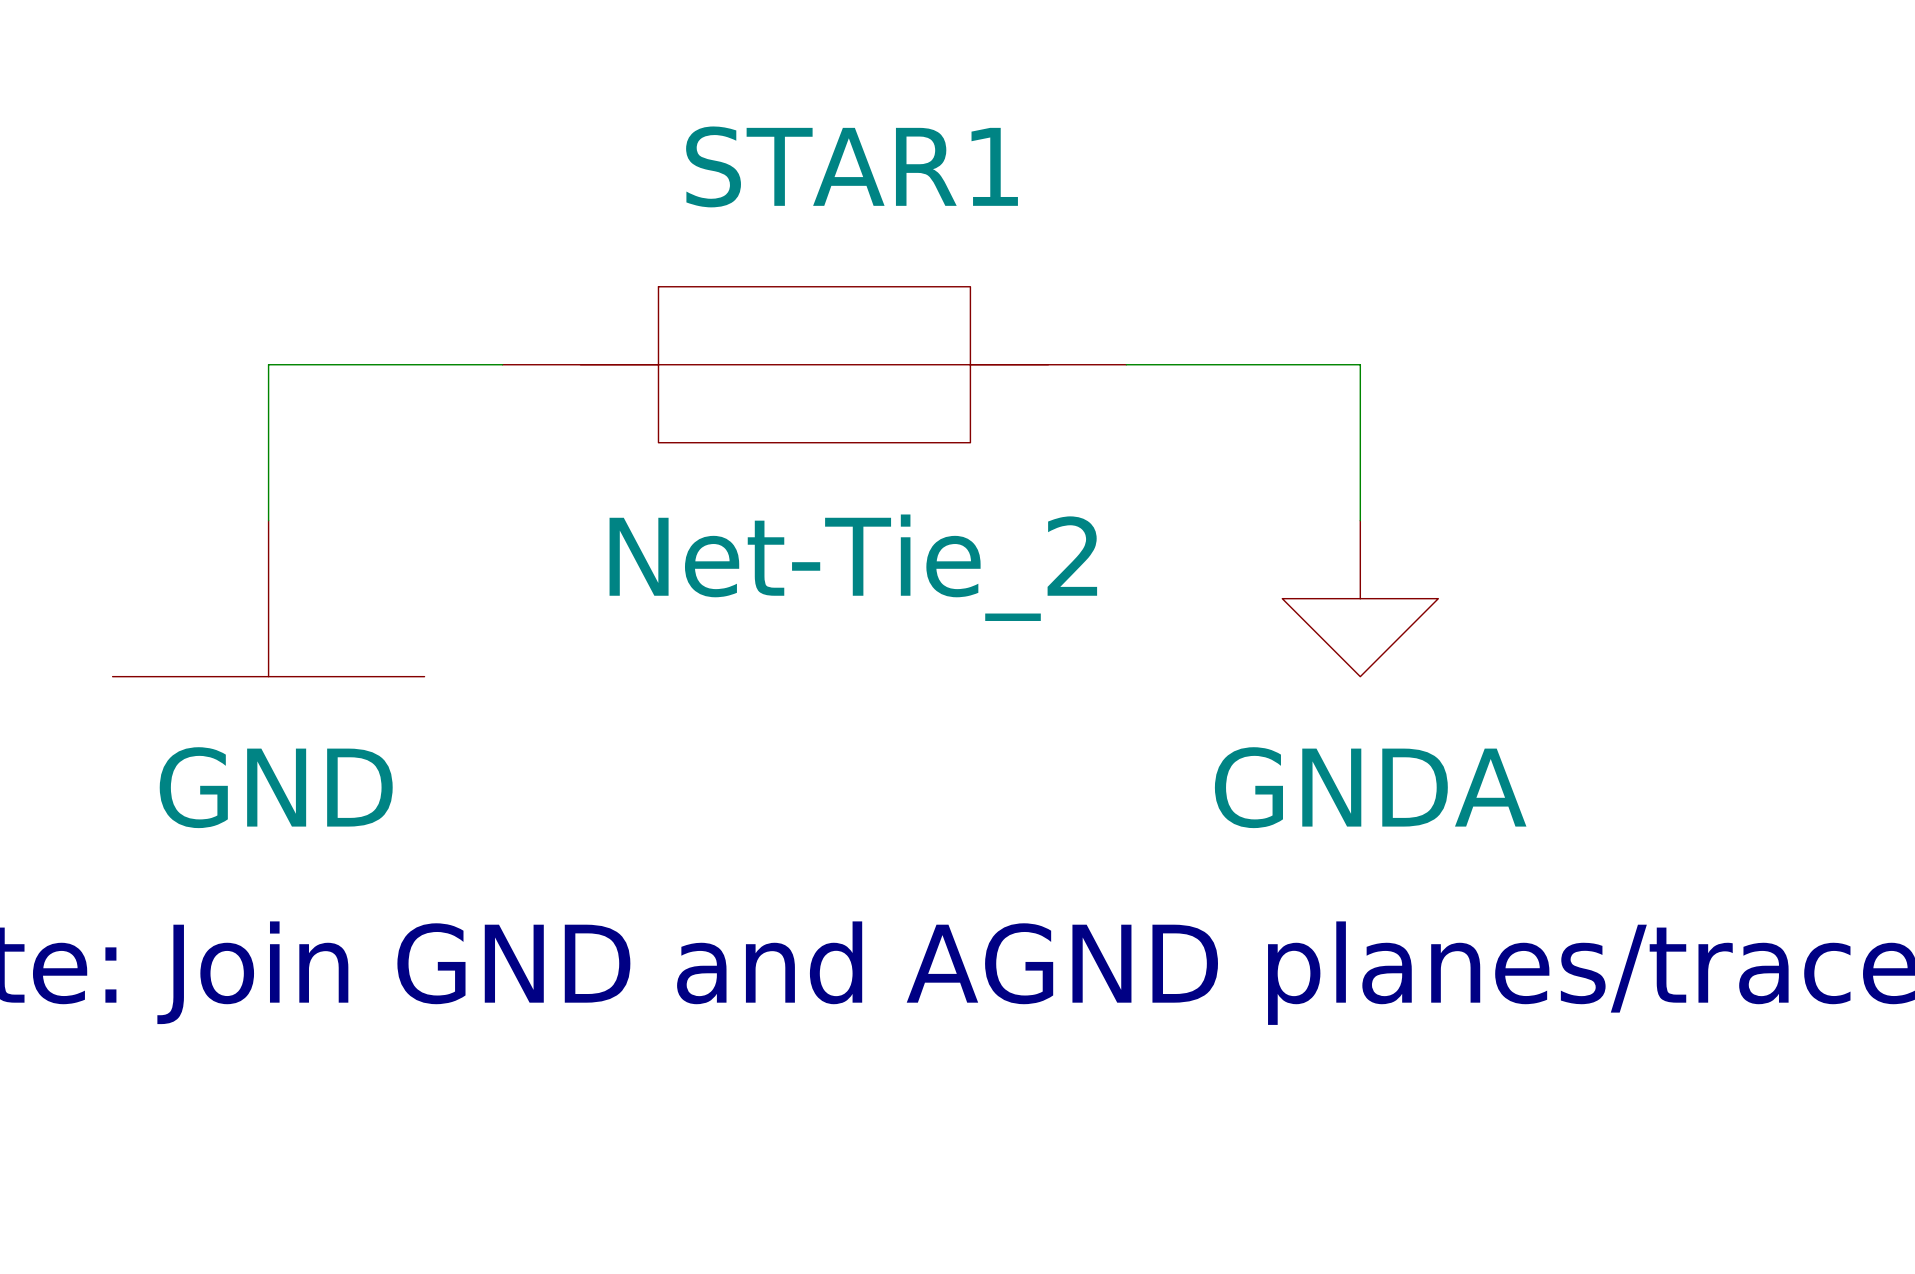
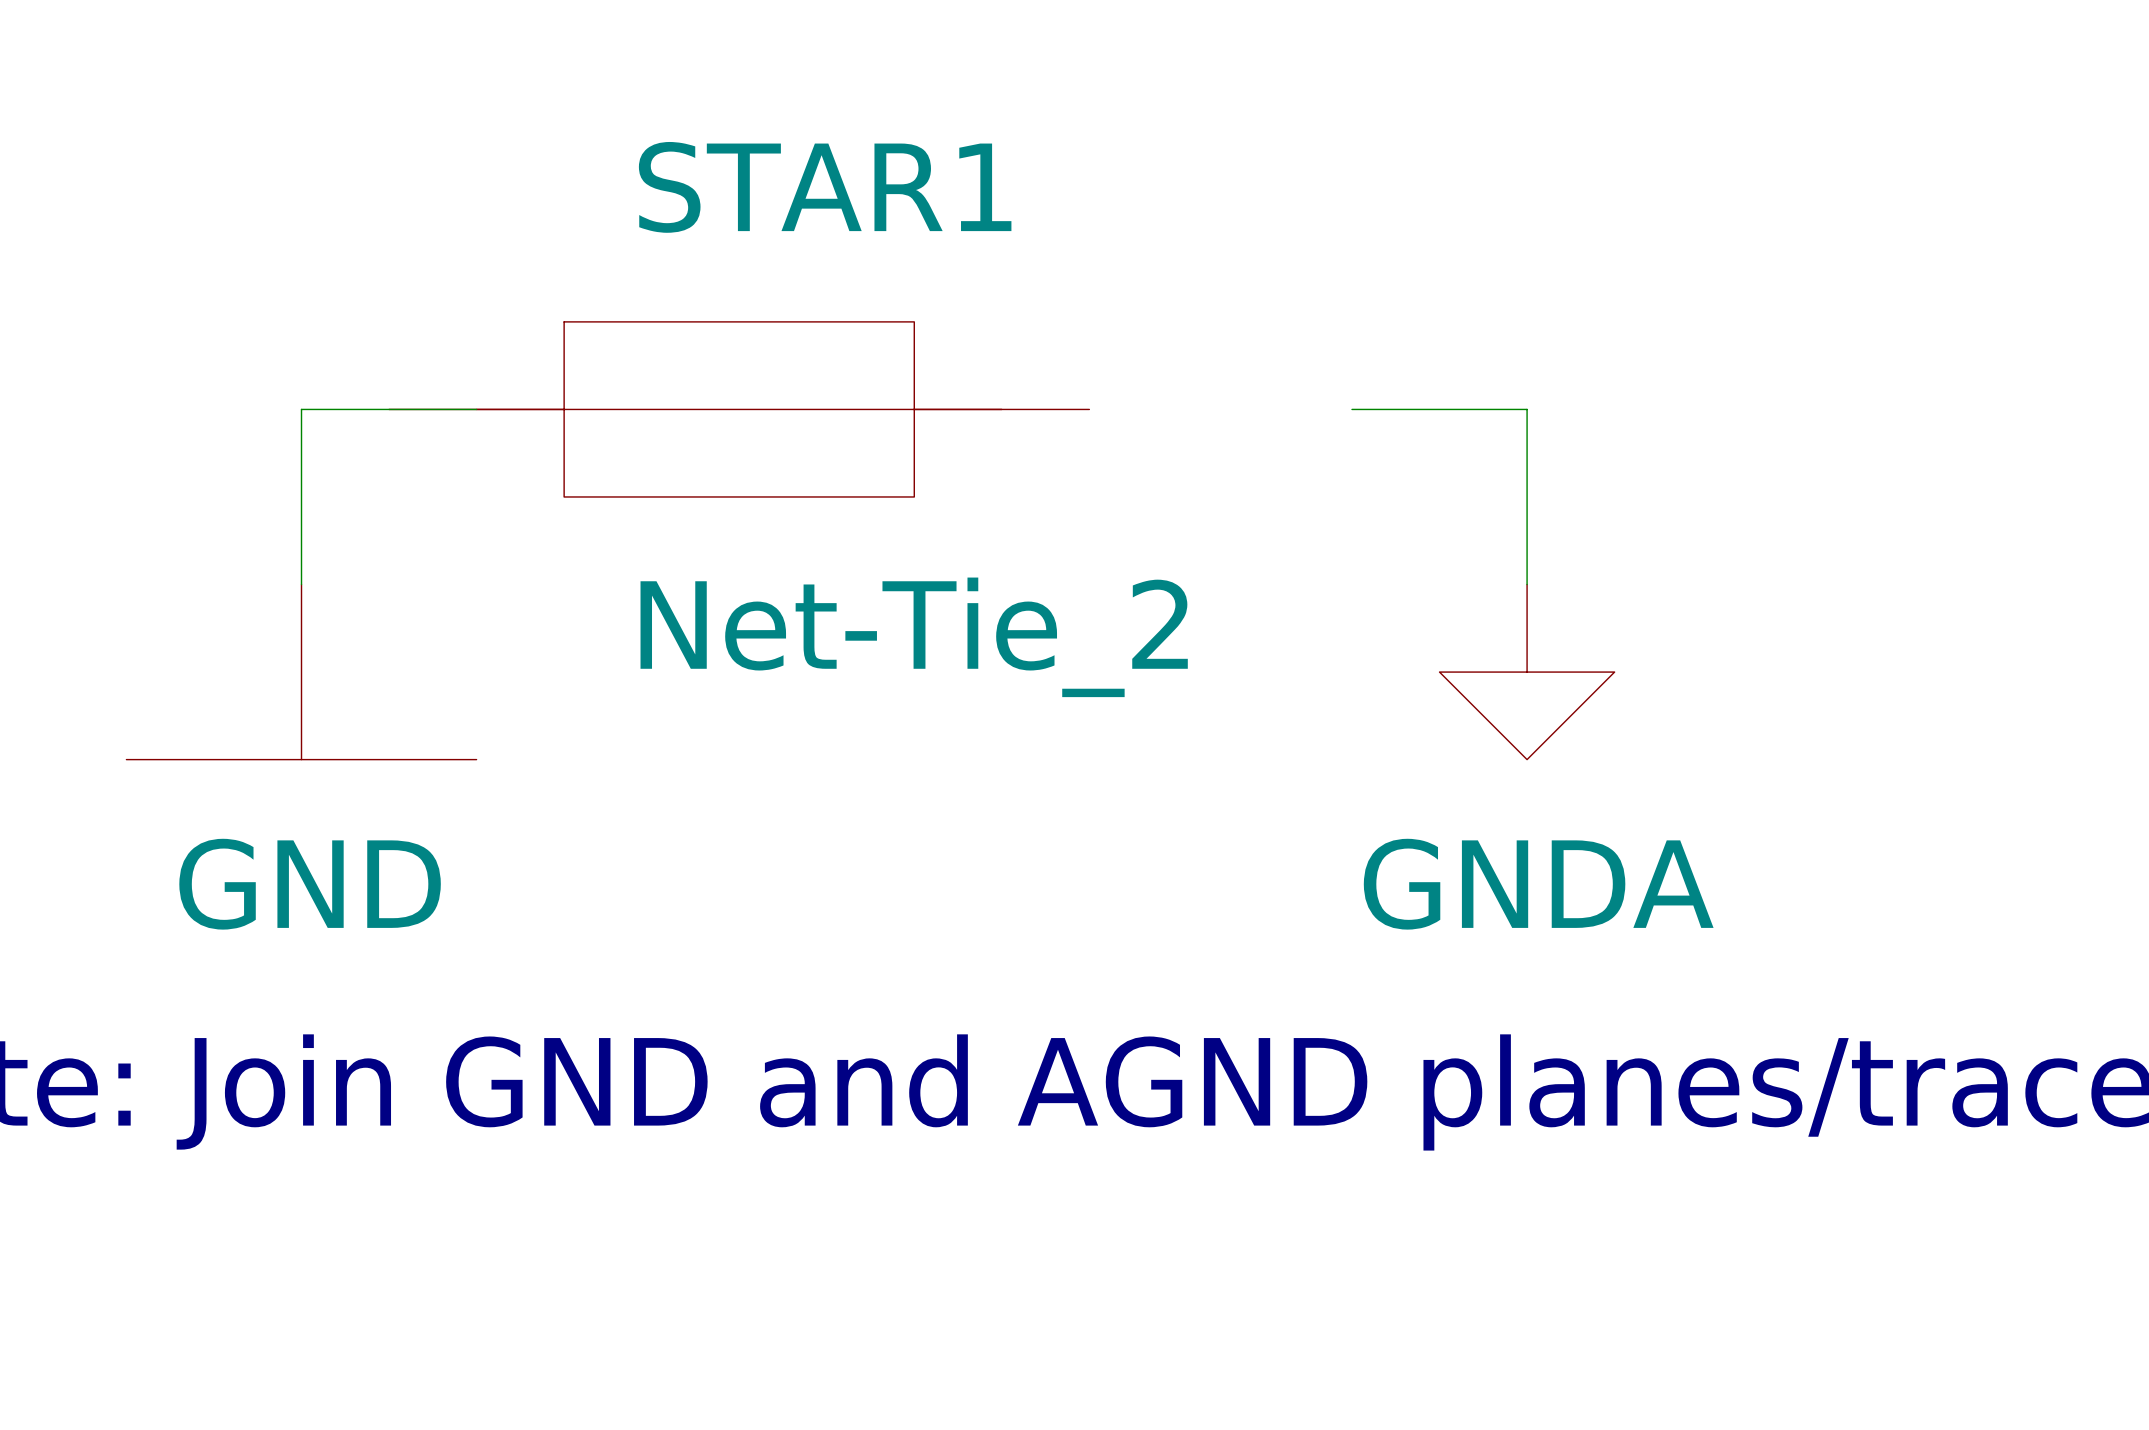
STAR1 name position: STAR1 (852, 166) -> STAR1 (825, 187)
STAR1 position: (814, 364) -> (739, 409)
wire: (1126, 364) (1204, 364) -> none
STAR1 value position: Net-Tie_2 (853, 567) -> Net-Tie_2 (914, 637)

